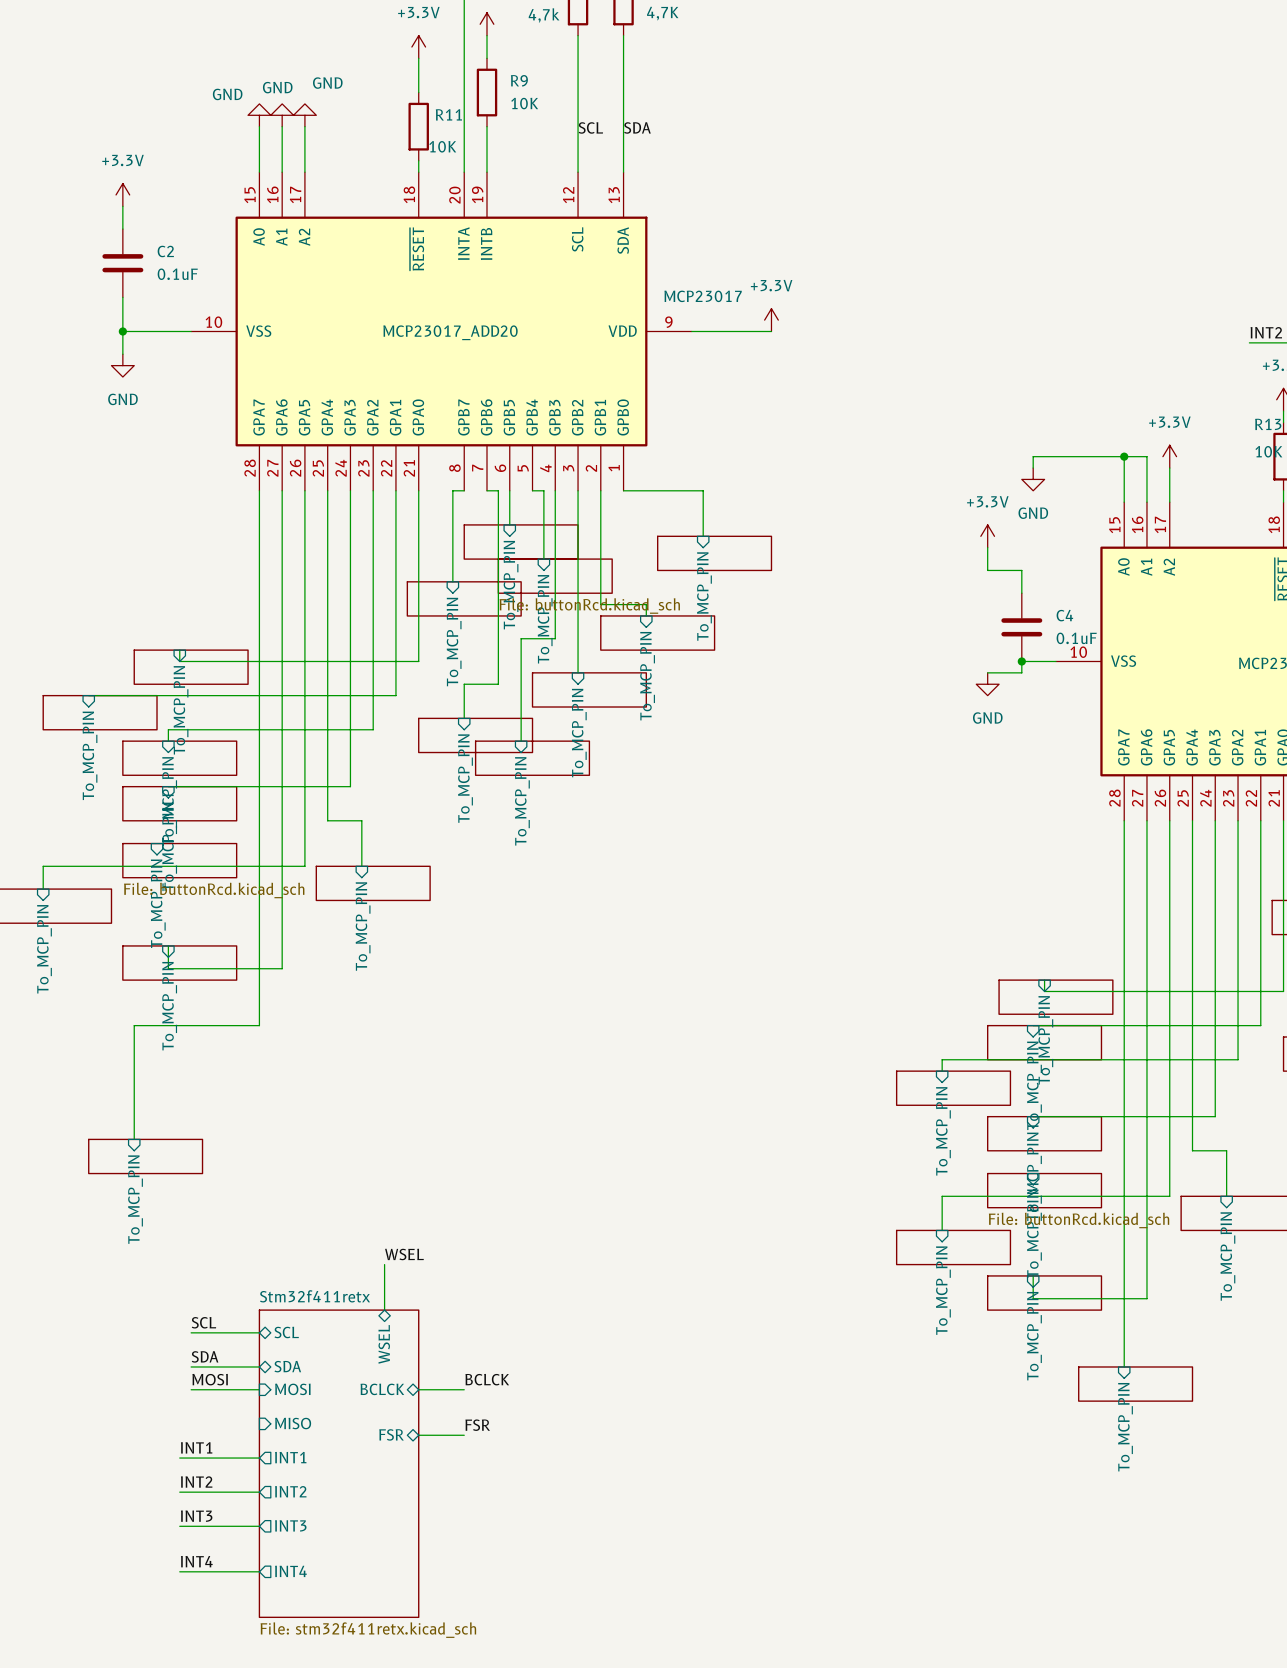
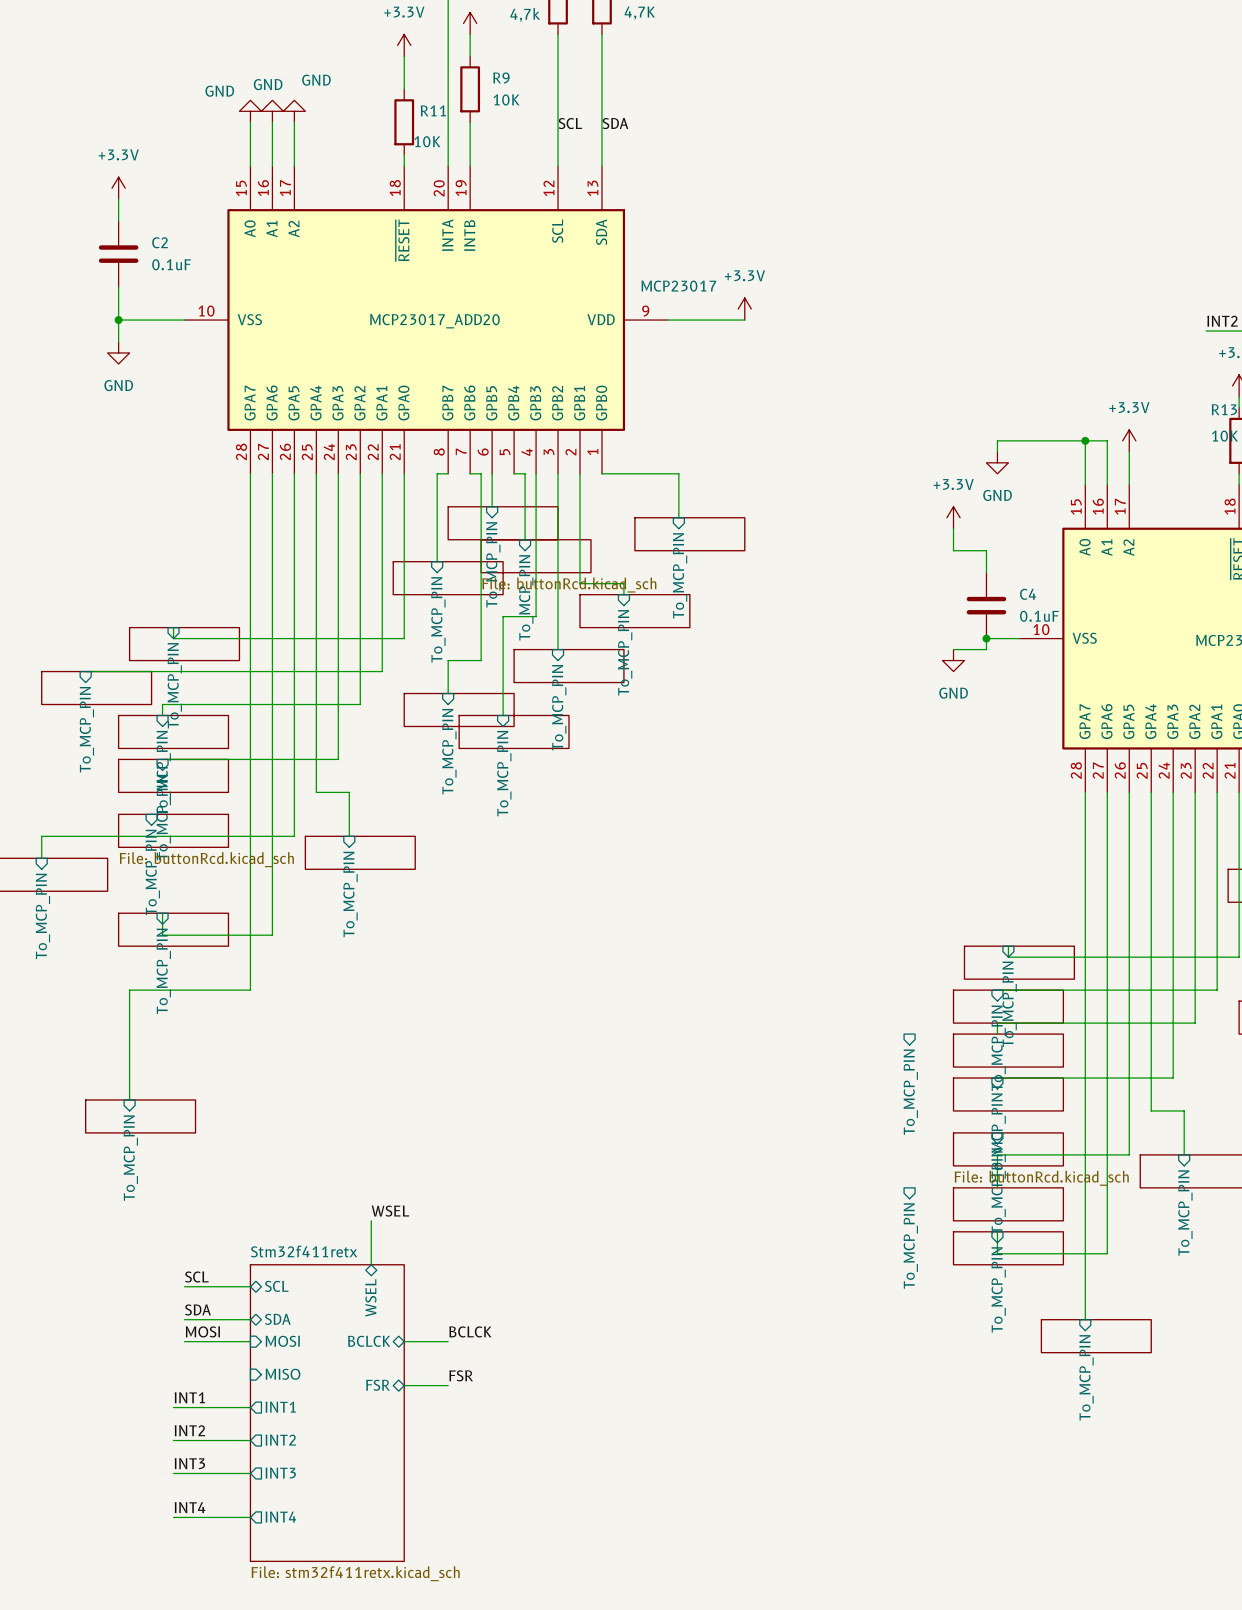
wire: (1033, 1059) (942, 1059) (942, 1071) -> (997, 1023) (997, 1034)
sheet position: (953, 1088) -> (1008, 1050)
wire: (1033, 1196) (942, 1196) (942, 1230) -> (997, 1154) (997, 1187)
sheet position: (953, 1247) -> (1008, 1204)

